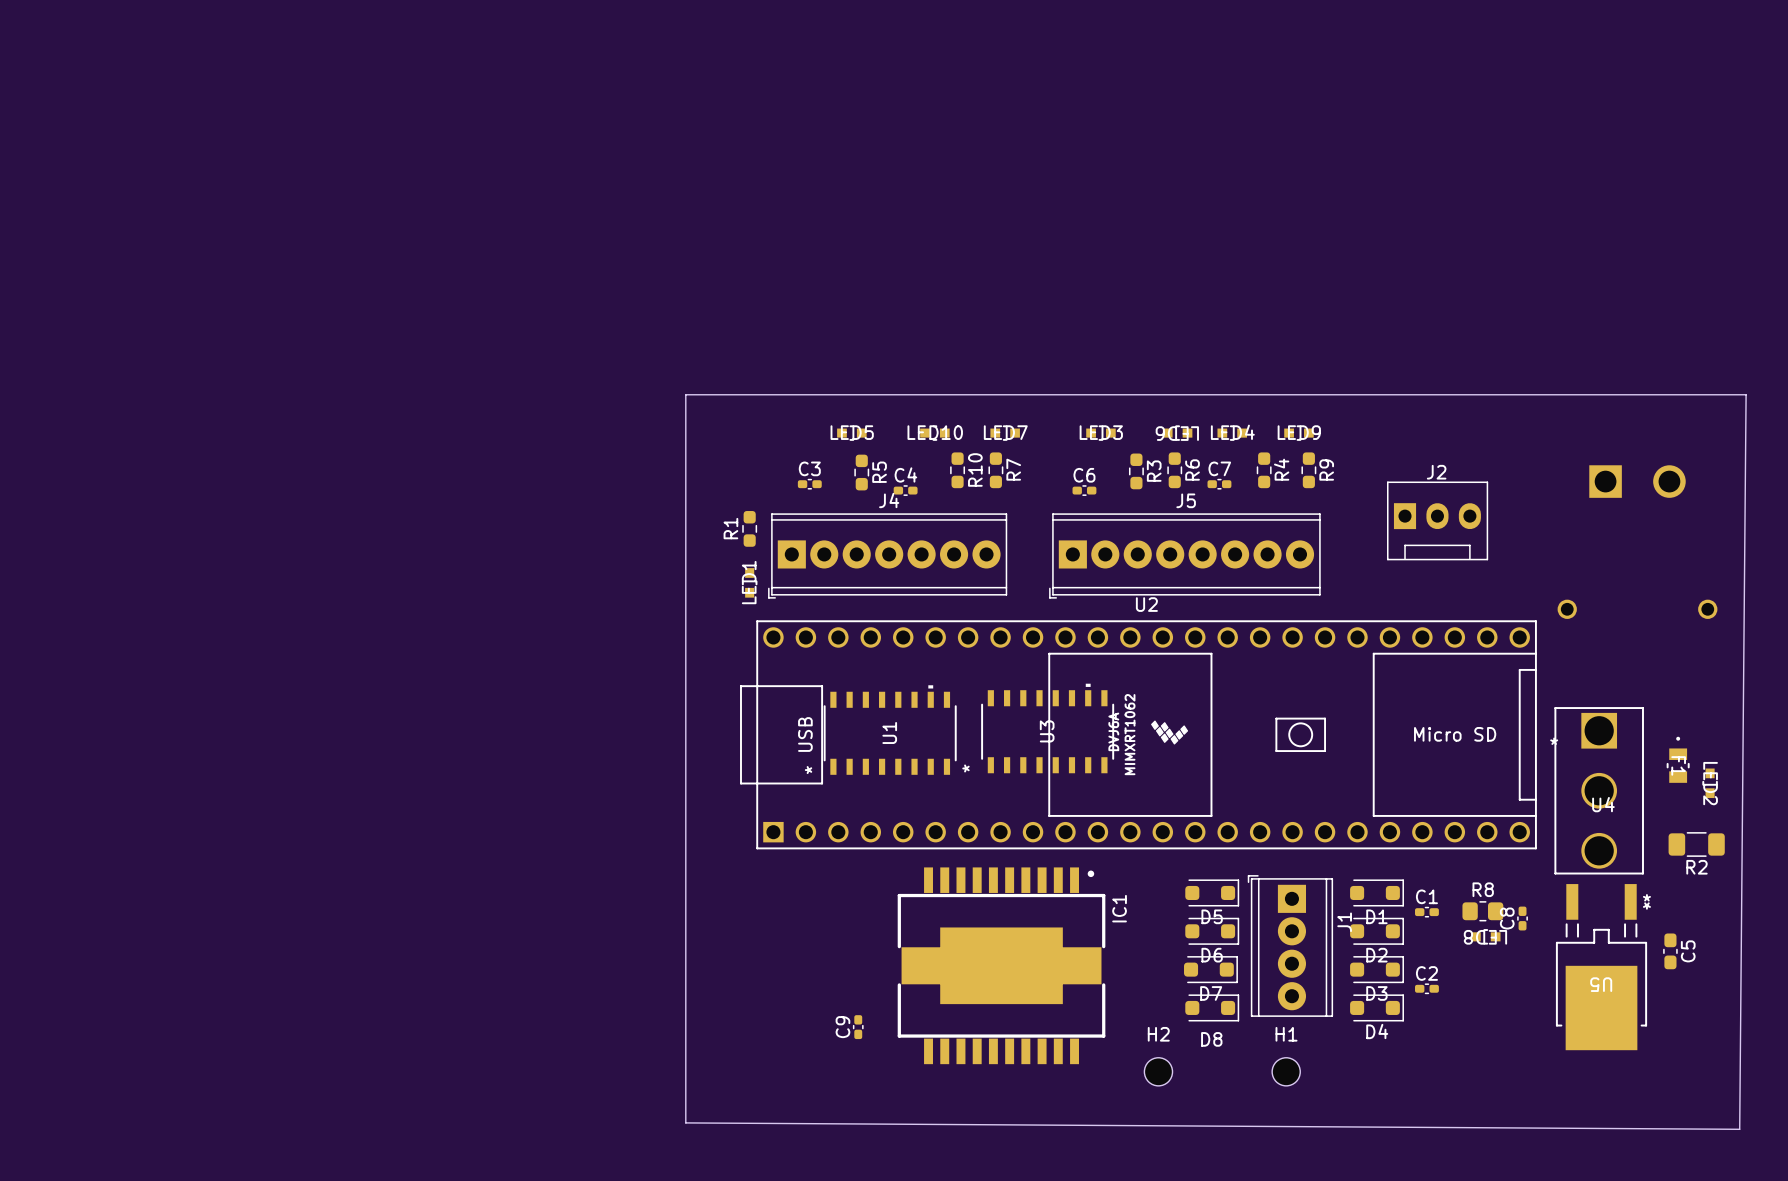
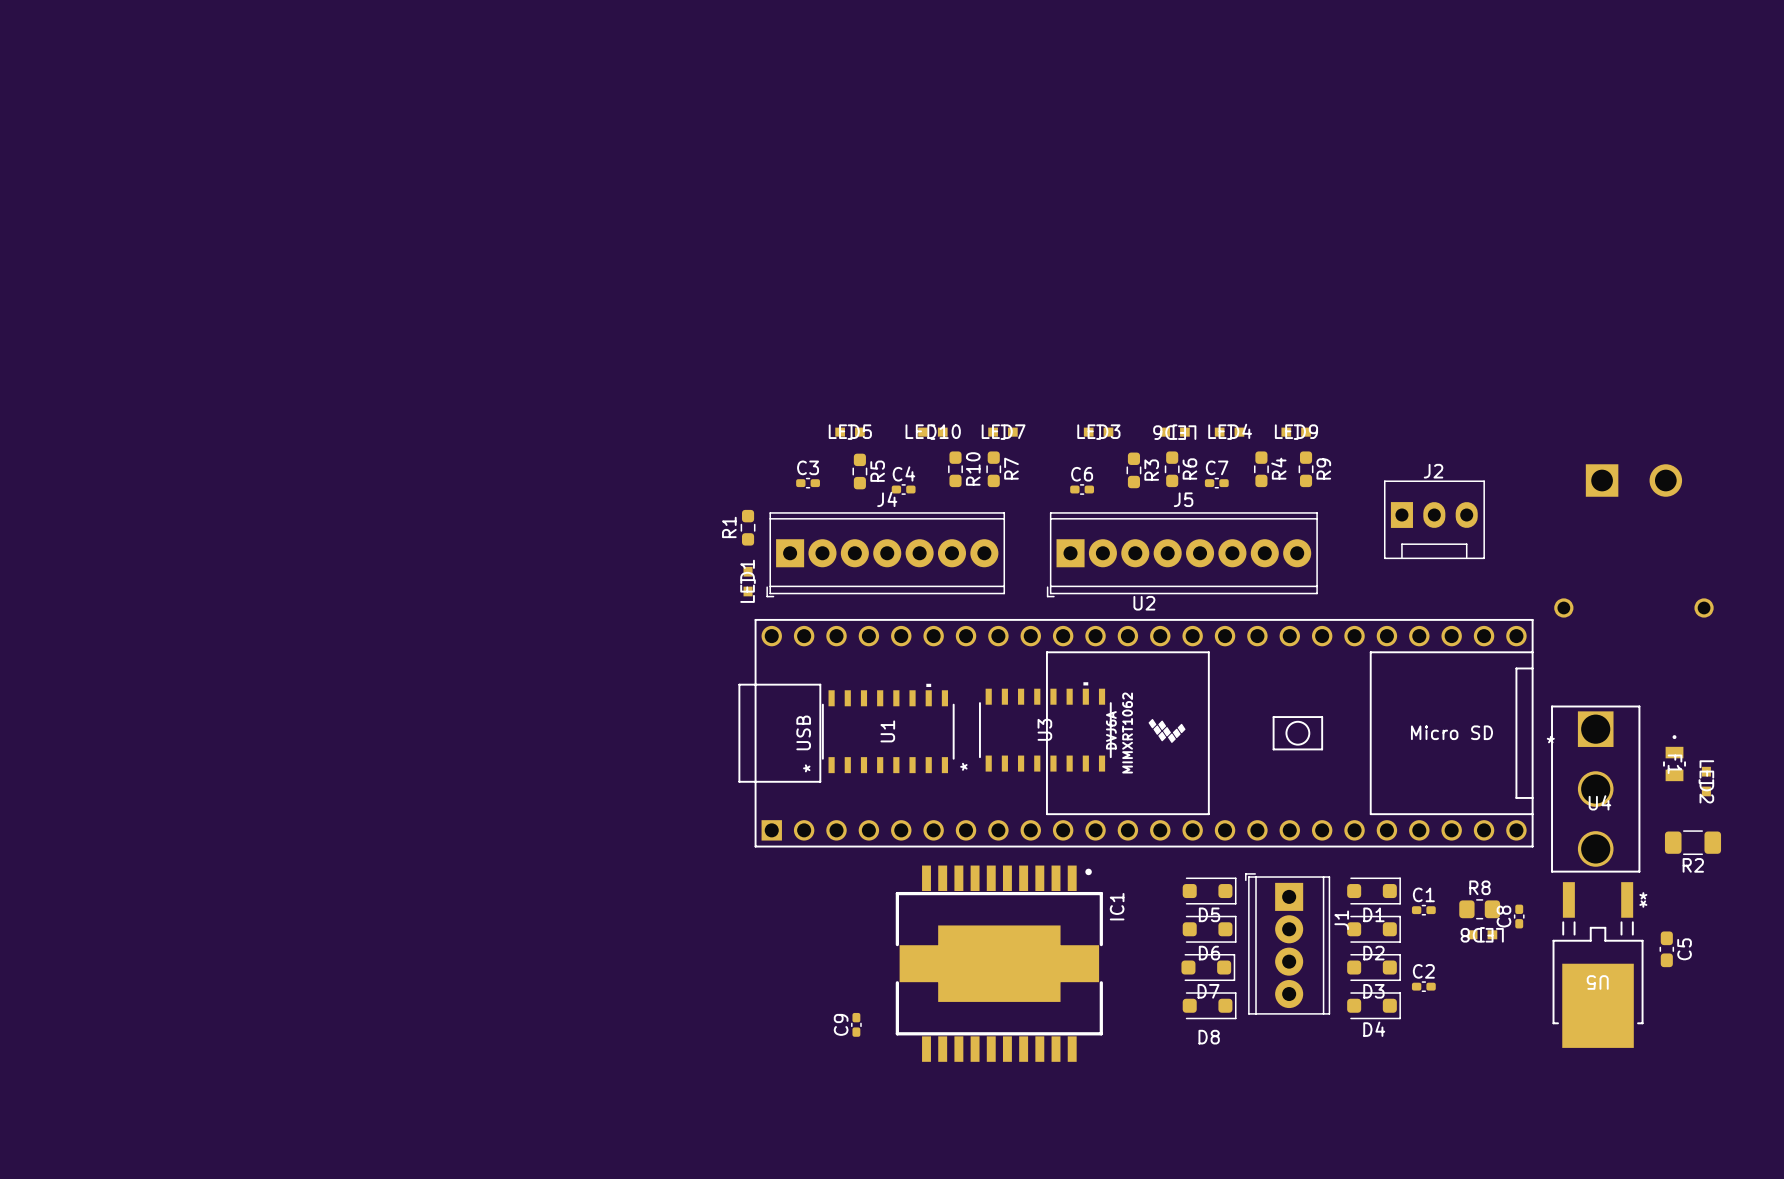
board edge: (685, 394) (1746, 394) (1739, 1129) (685, 1122) (685, 394) -> none
H2: (1158, 1071) -> none
H1: (1286, 1071) -> none

